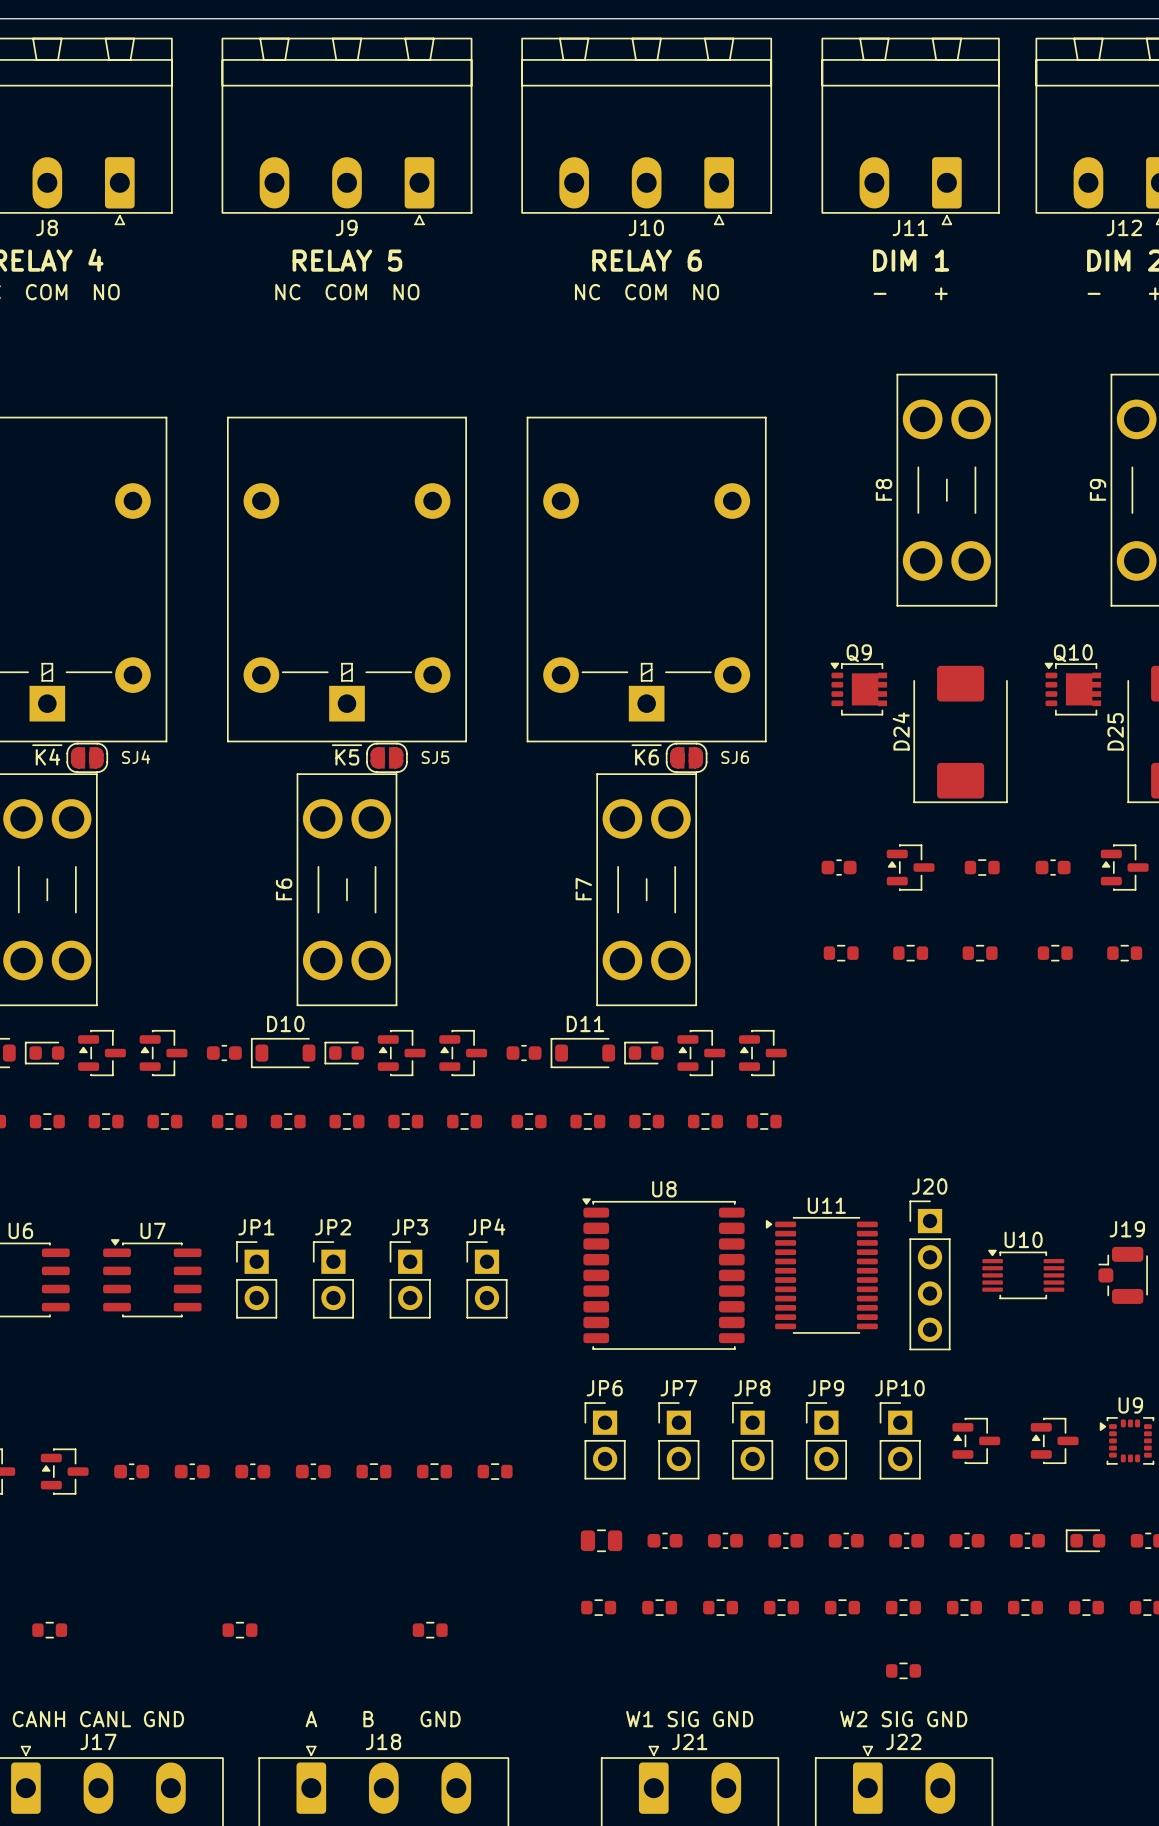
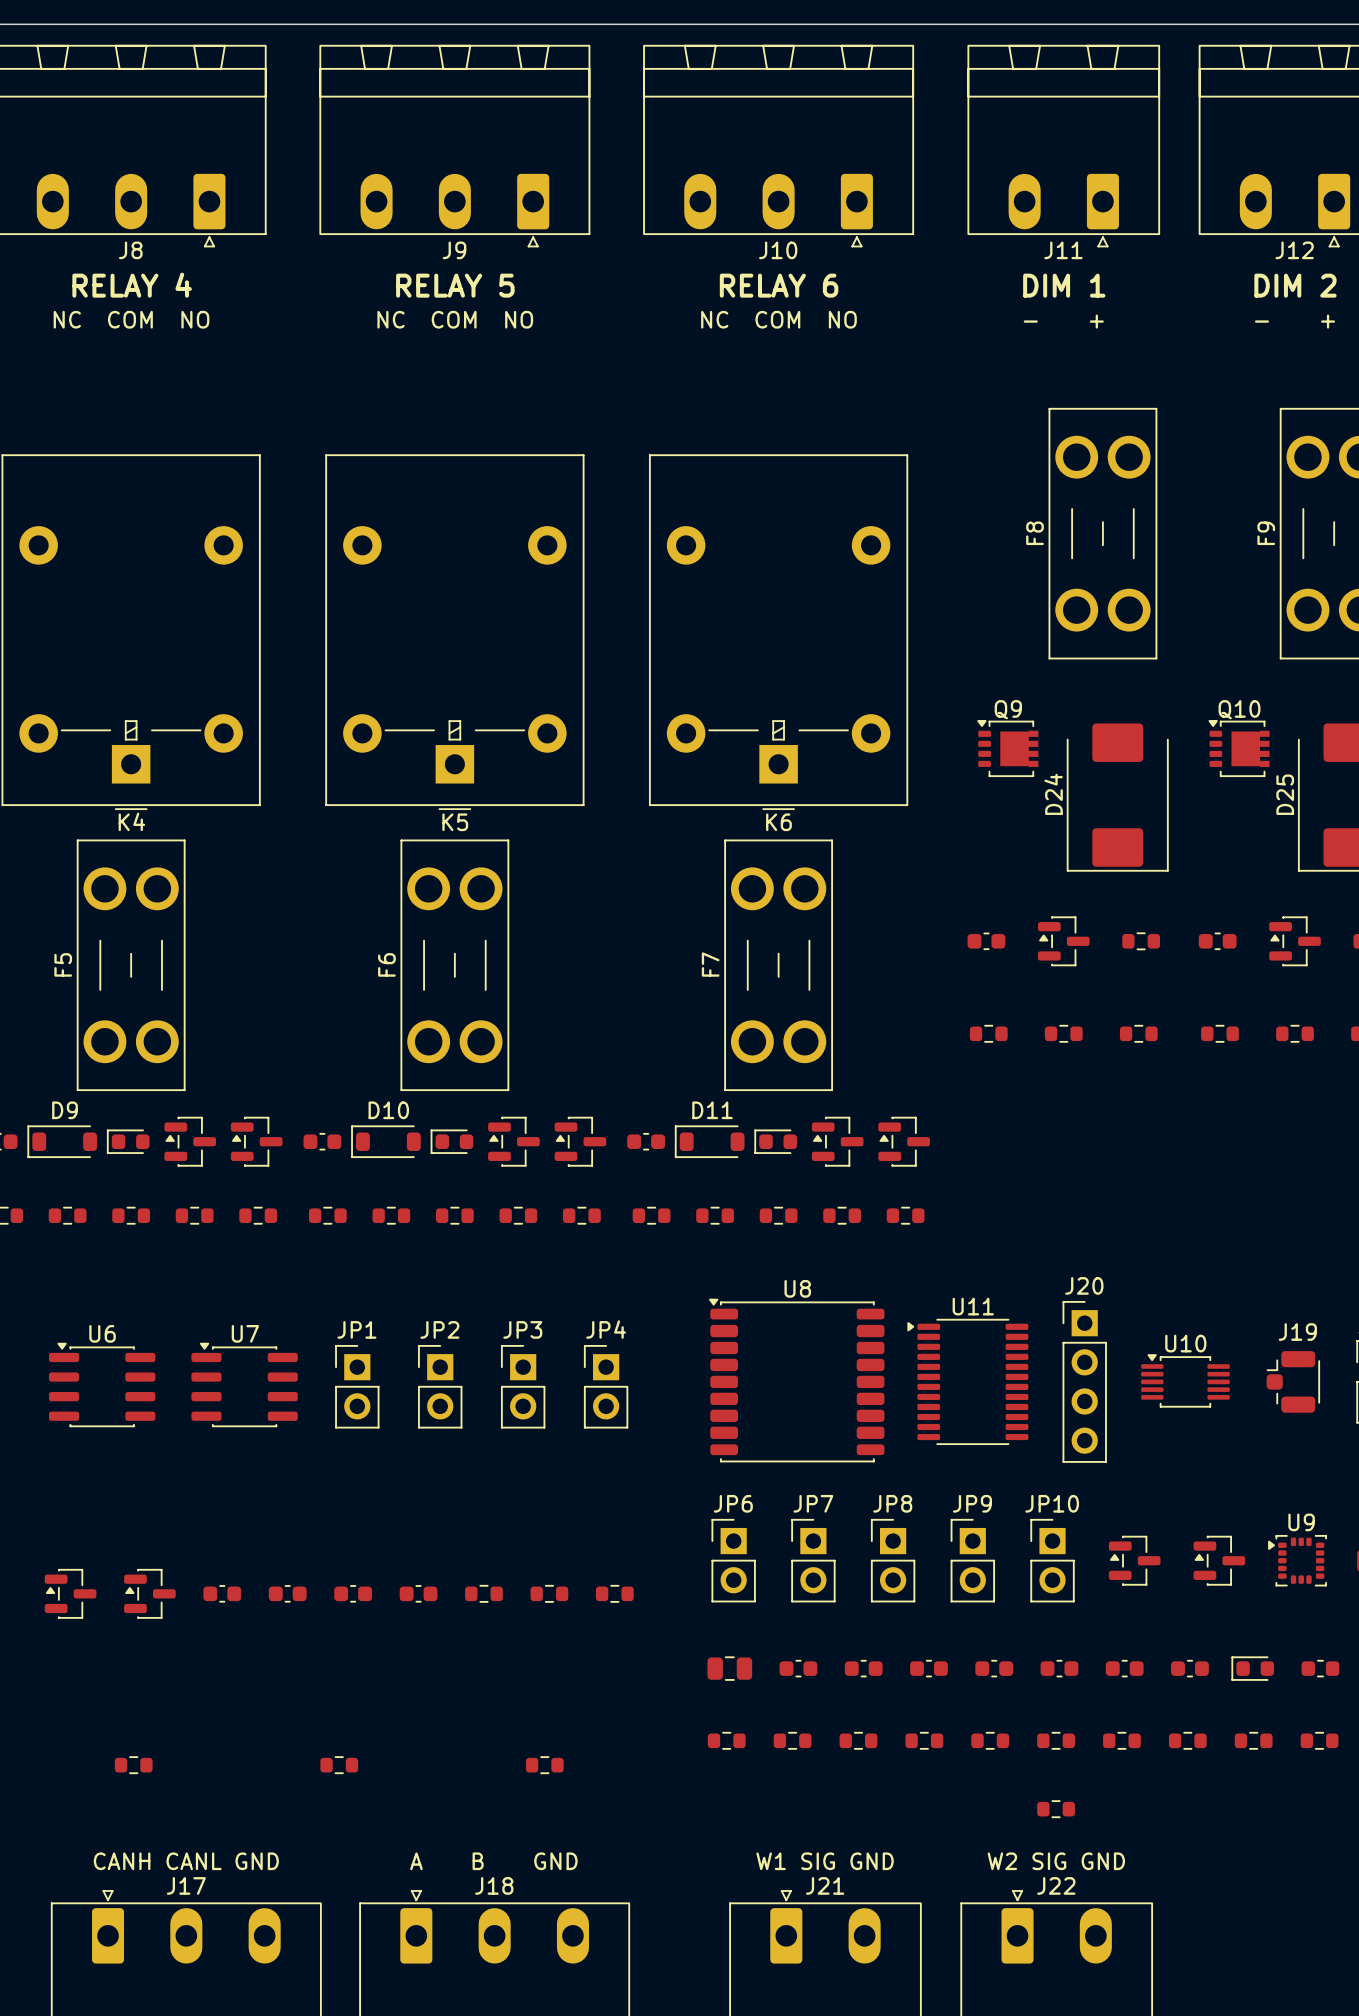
SJ4: (87, 757) -> none
SJ5: (386, 757) -> none
SJ6: (686, 757) -> none

